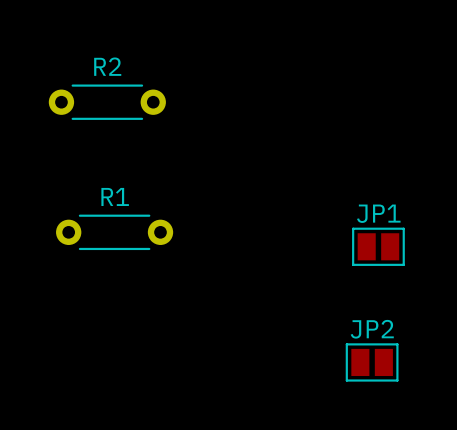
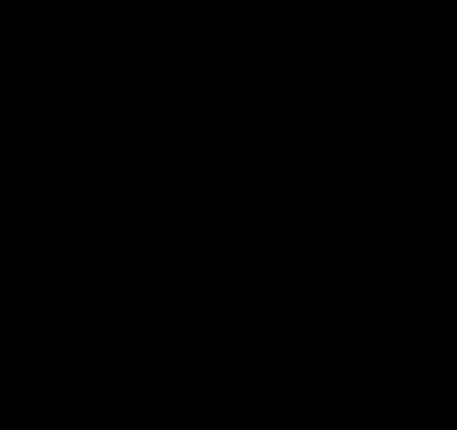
R2: (107, 102) -> none
R1: (114, 232) -> none
JP1: (378, 246) -> none
JP2: (372, 362) -> none

